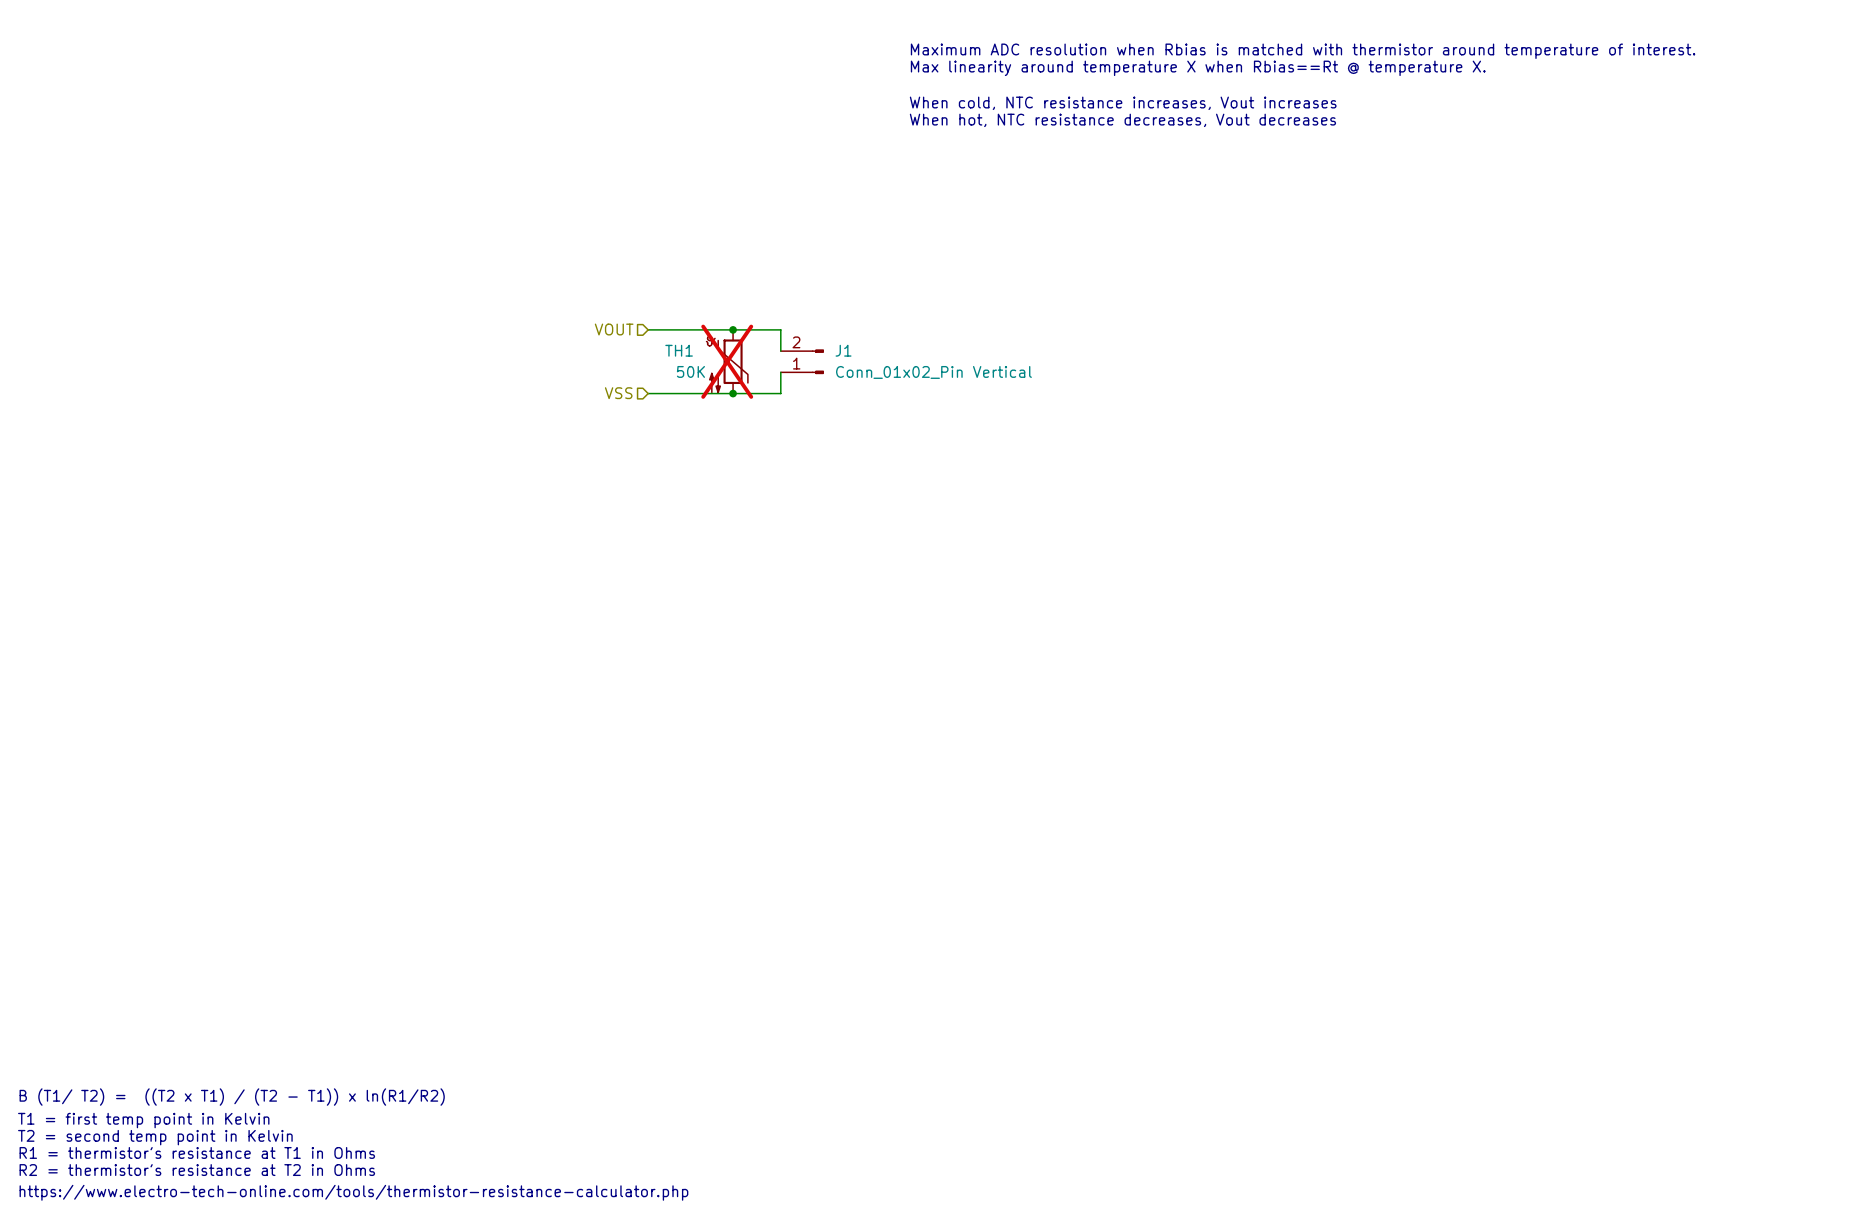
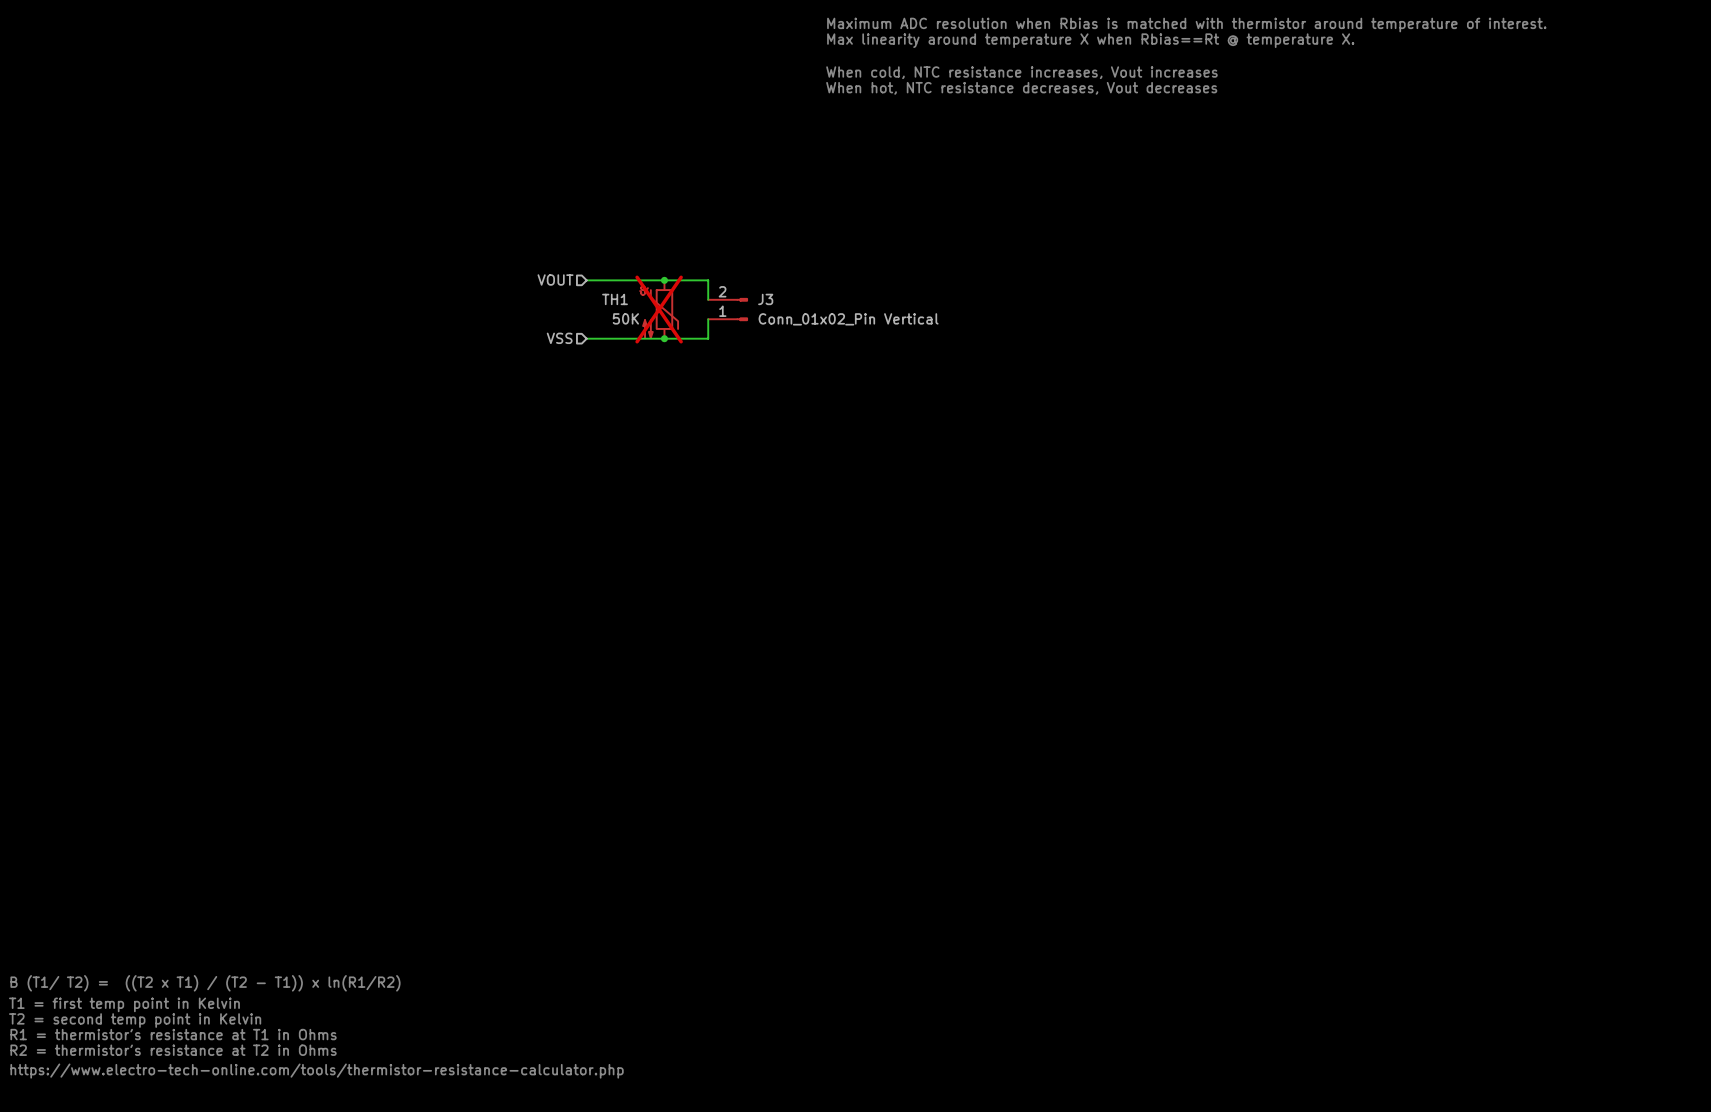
J1 name: J1 (843, 350) -> J3 (765, 299)

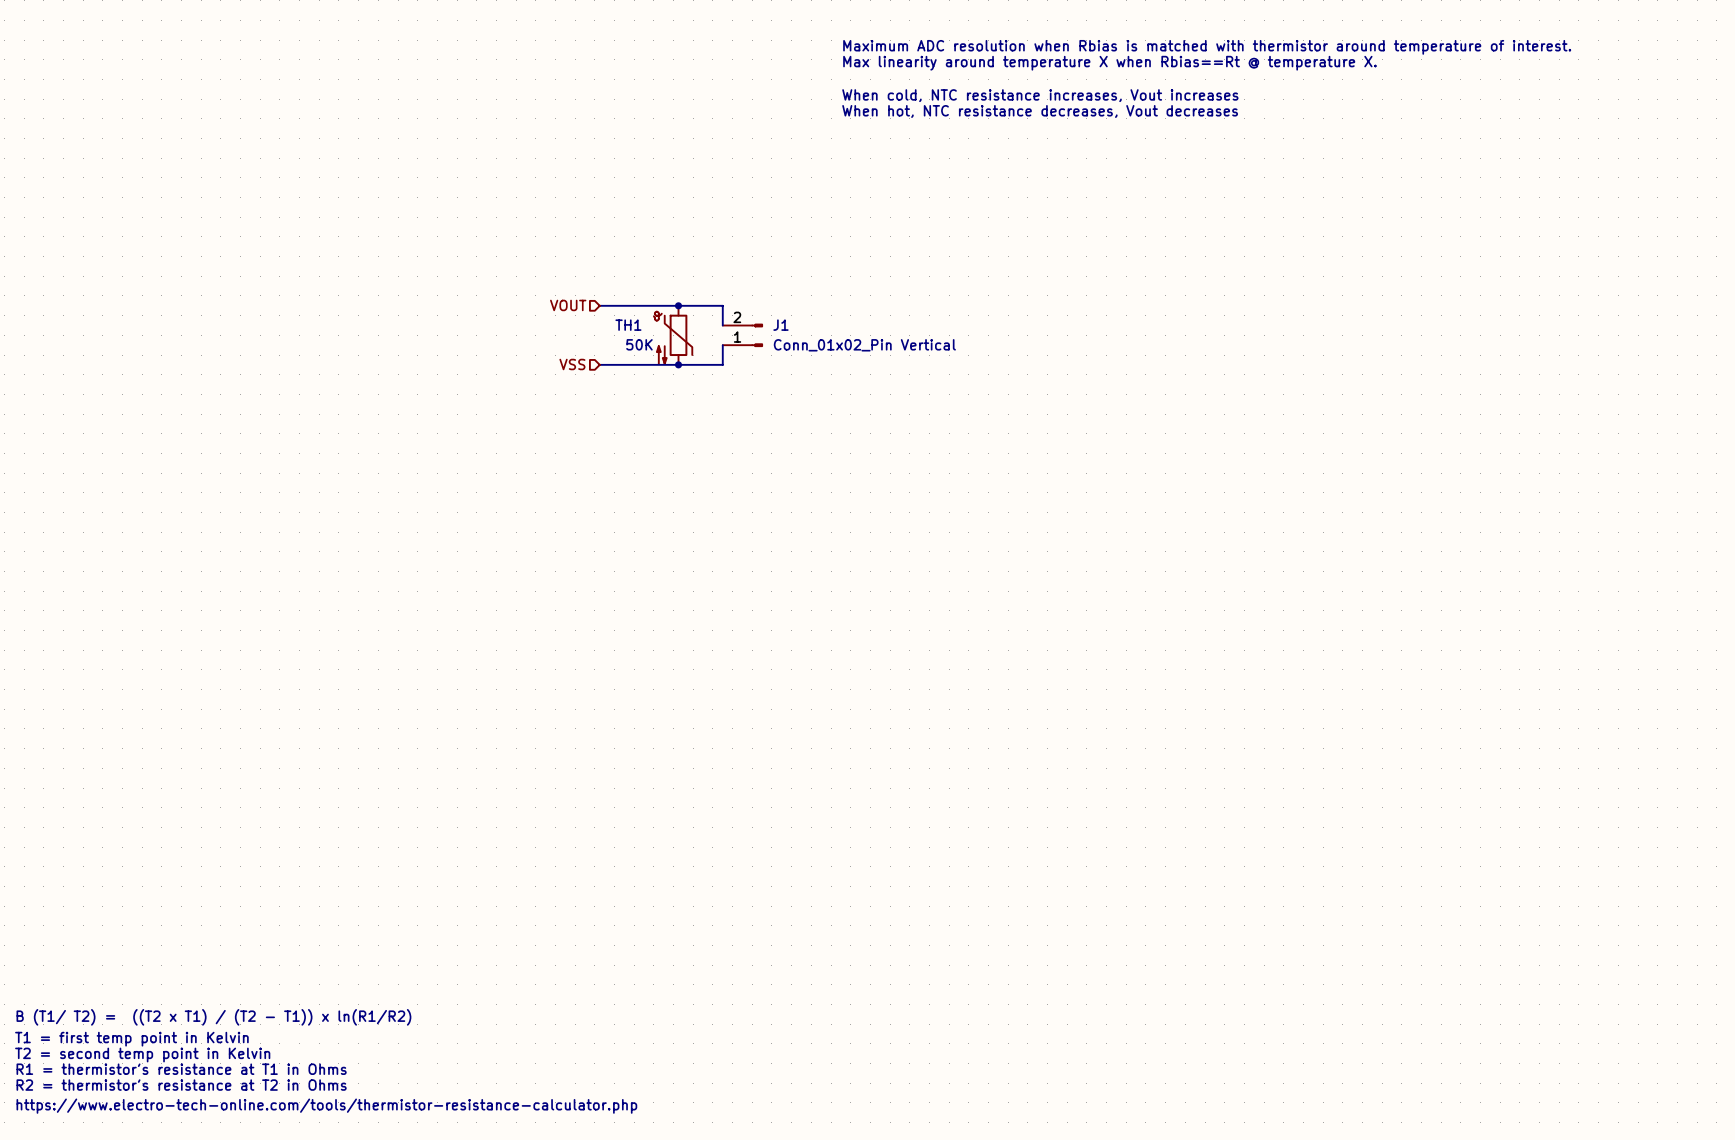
J3 name: J3 (765, 299) -> J1 (780, 325)
TH1 do-not-place cross: (659, 309) -> none

